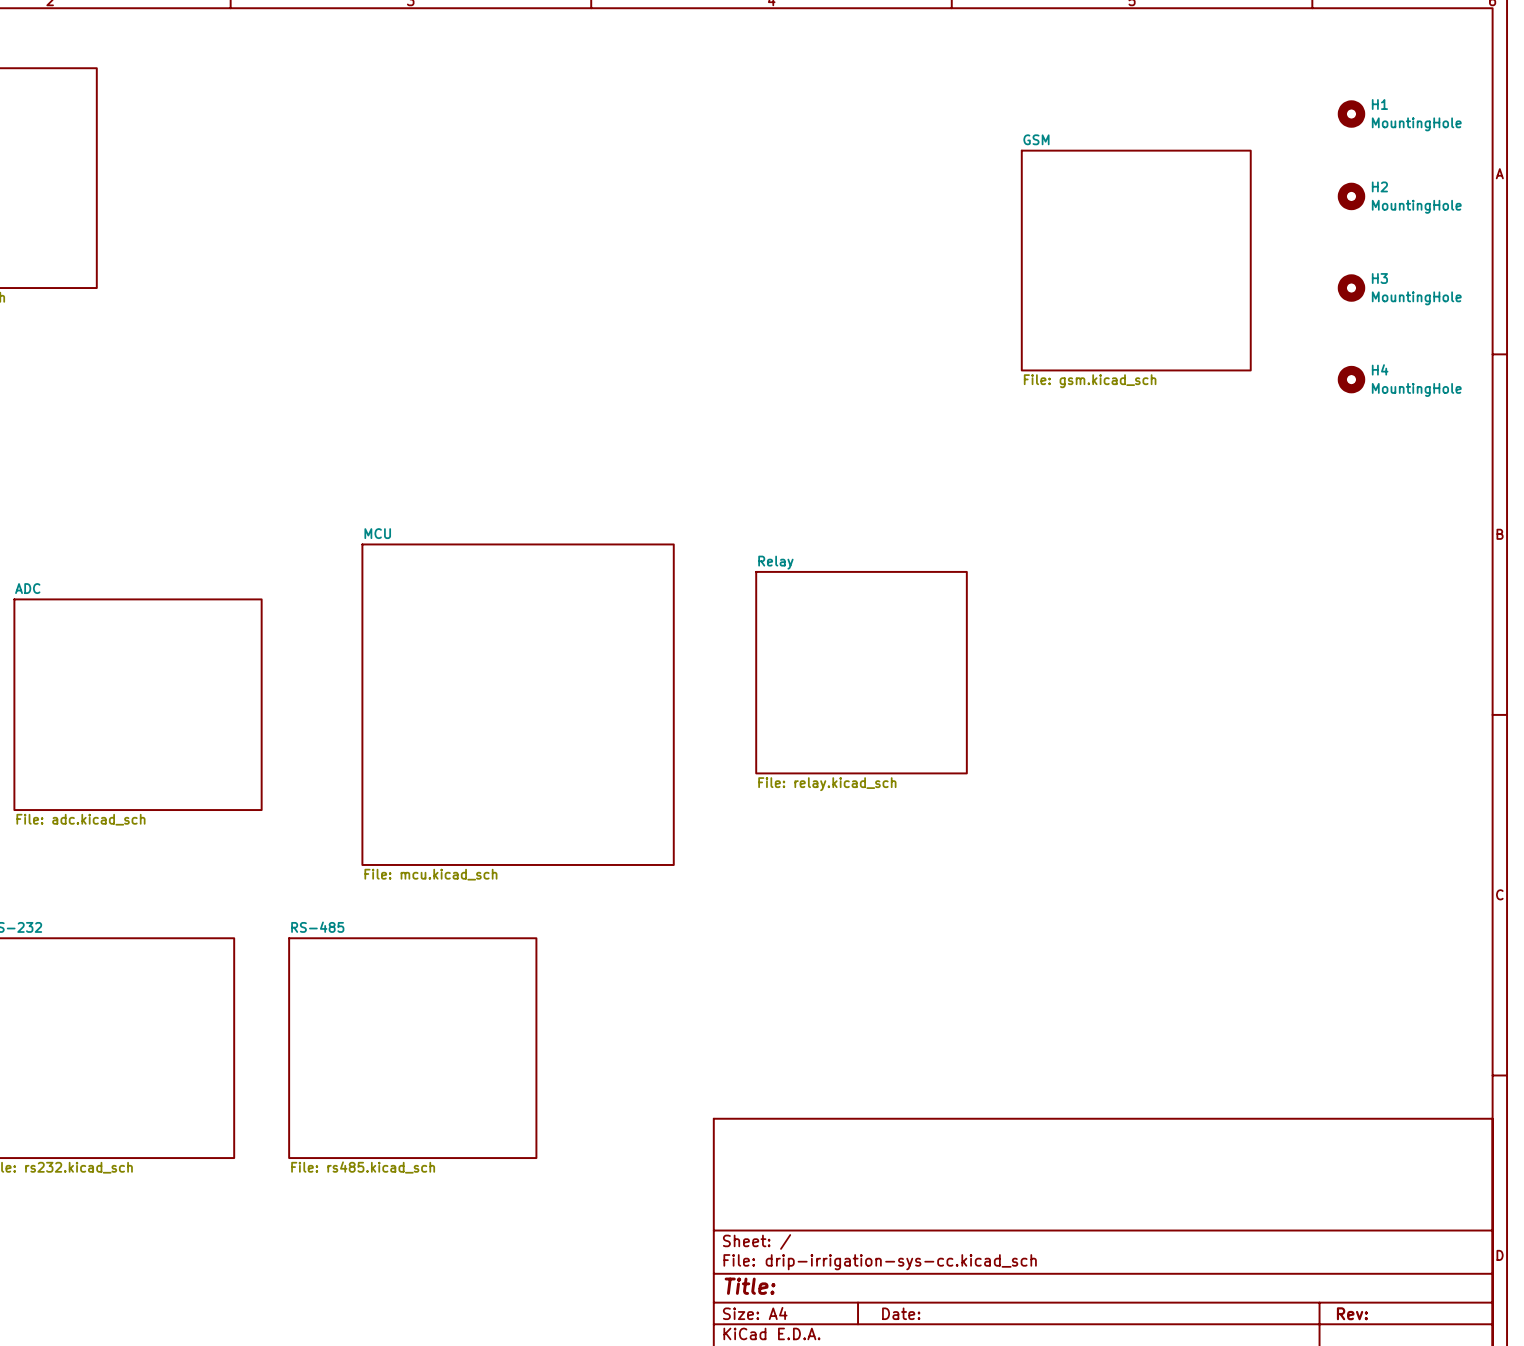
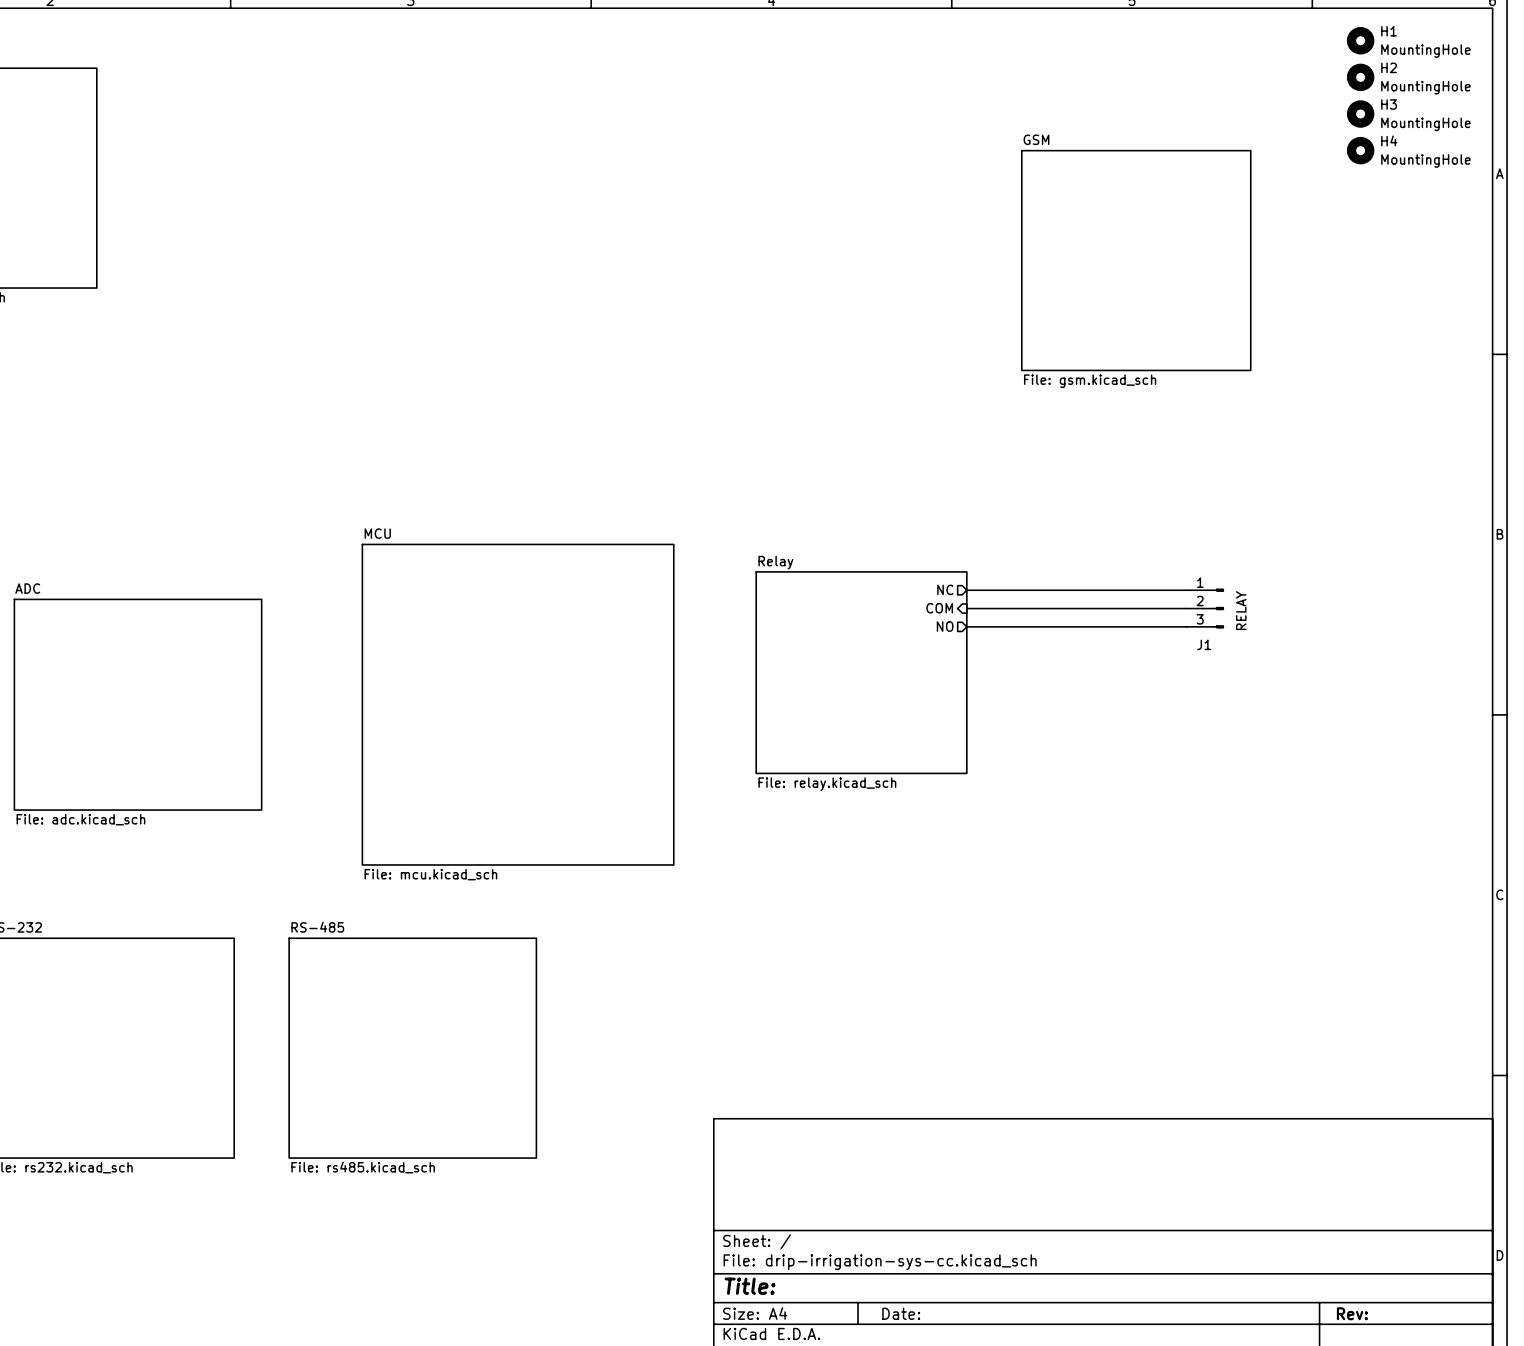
H1 position: (1351, 114) -> (1360, 40)
H2 position: (1351, 196) -> (1360, 77)
H3 position: (1351, 288) -> (1360, 114)
H4 position: (1351, 379) -> (1360, 150)
sheet pin: none -> NC (945, 589)
wire: none -> (966, 590) (1186, 590)
sheet pin: none -> COM (939, 608)
wire: none -> (966, 608) (1186, 608)
J1: none -> RELAY (1205, 608)
sheet pin: none -> NO (945, 626)
wire: none -> (966, 626) (1186, 626)

